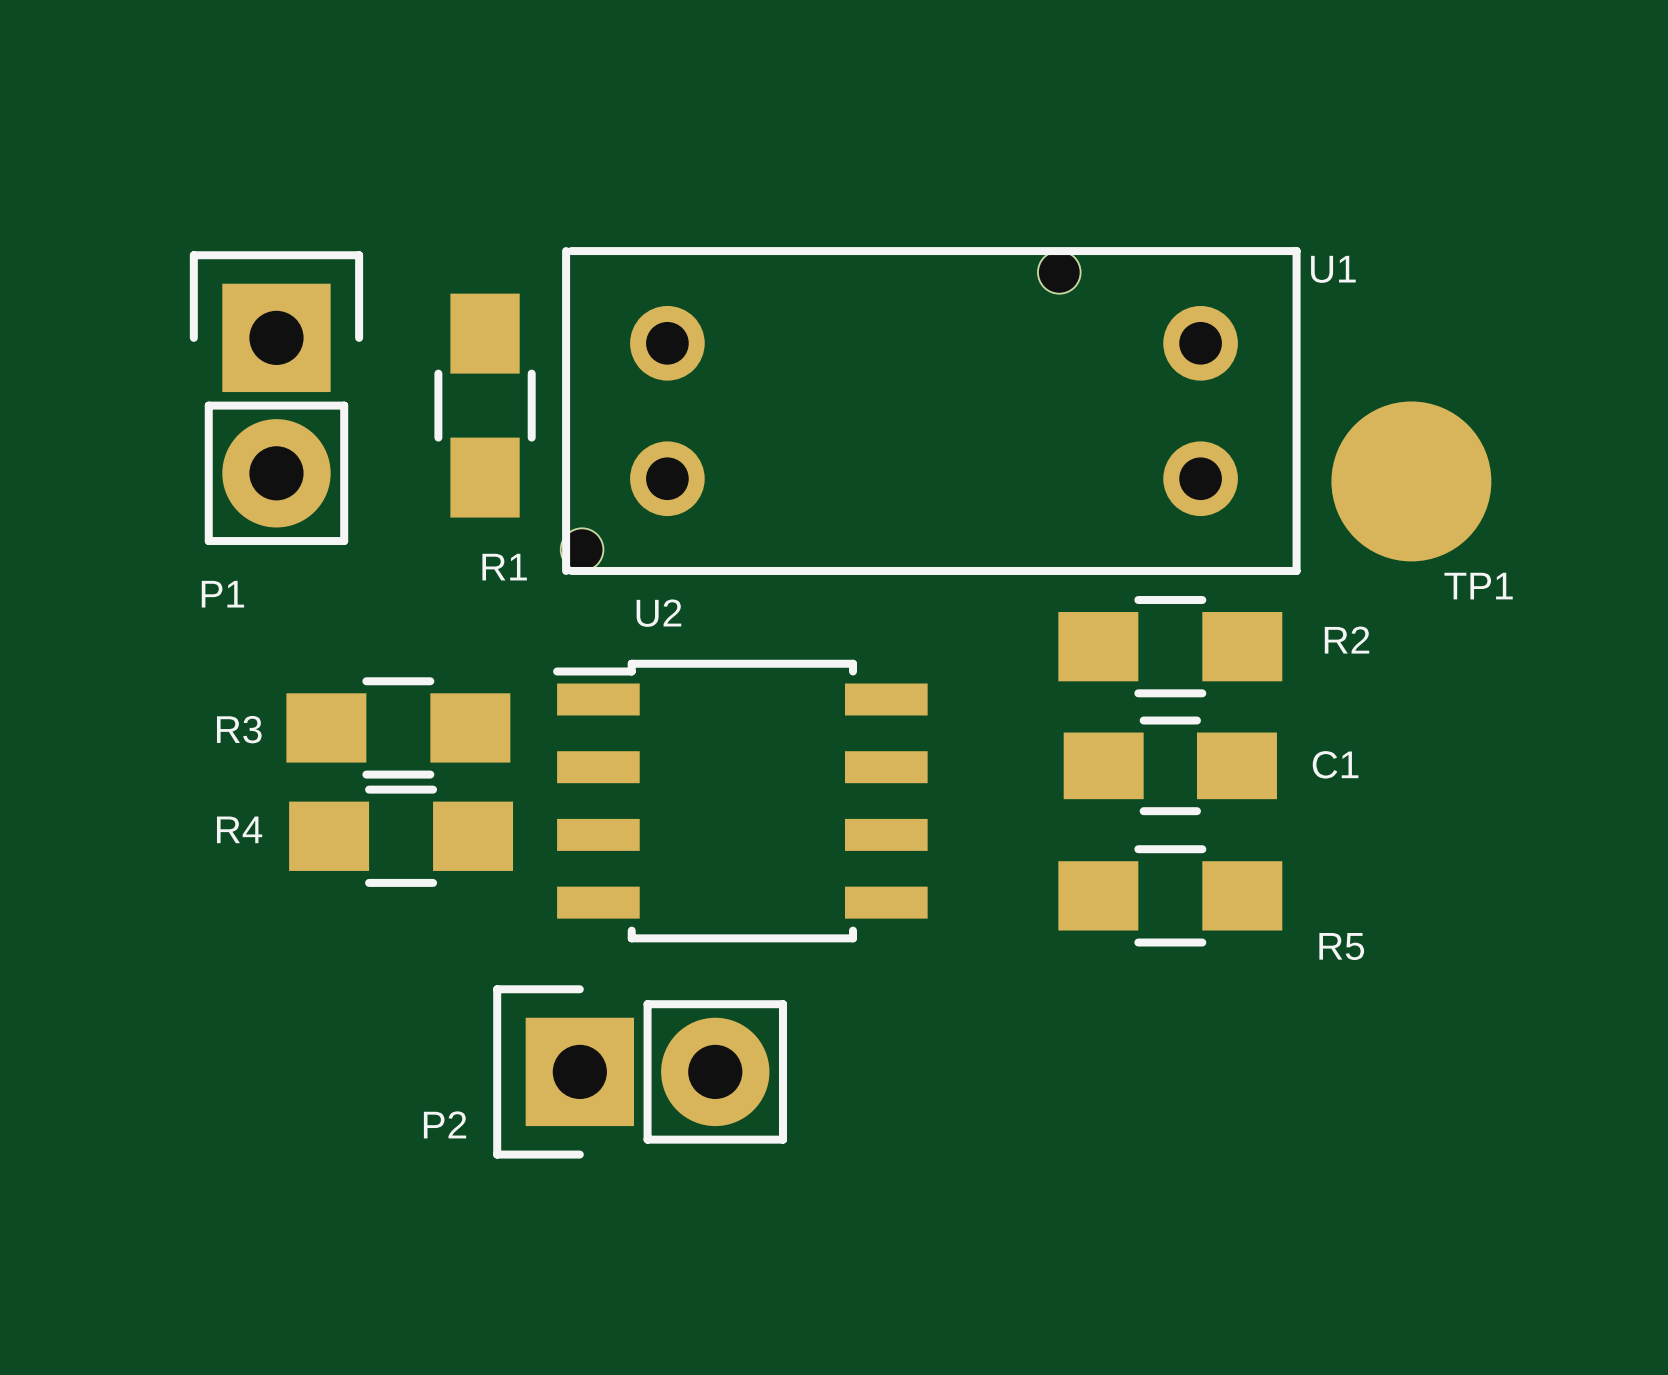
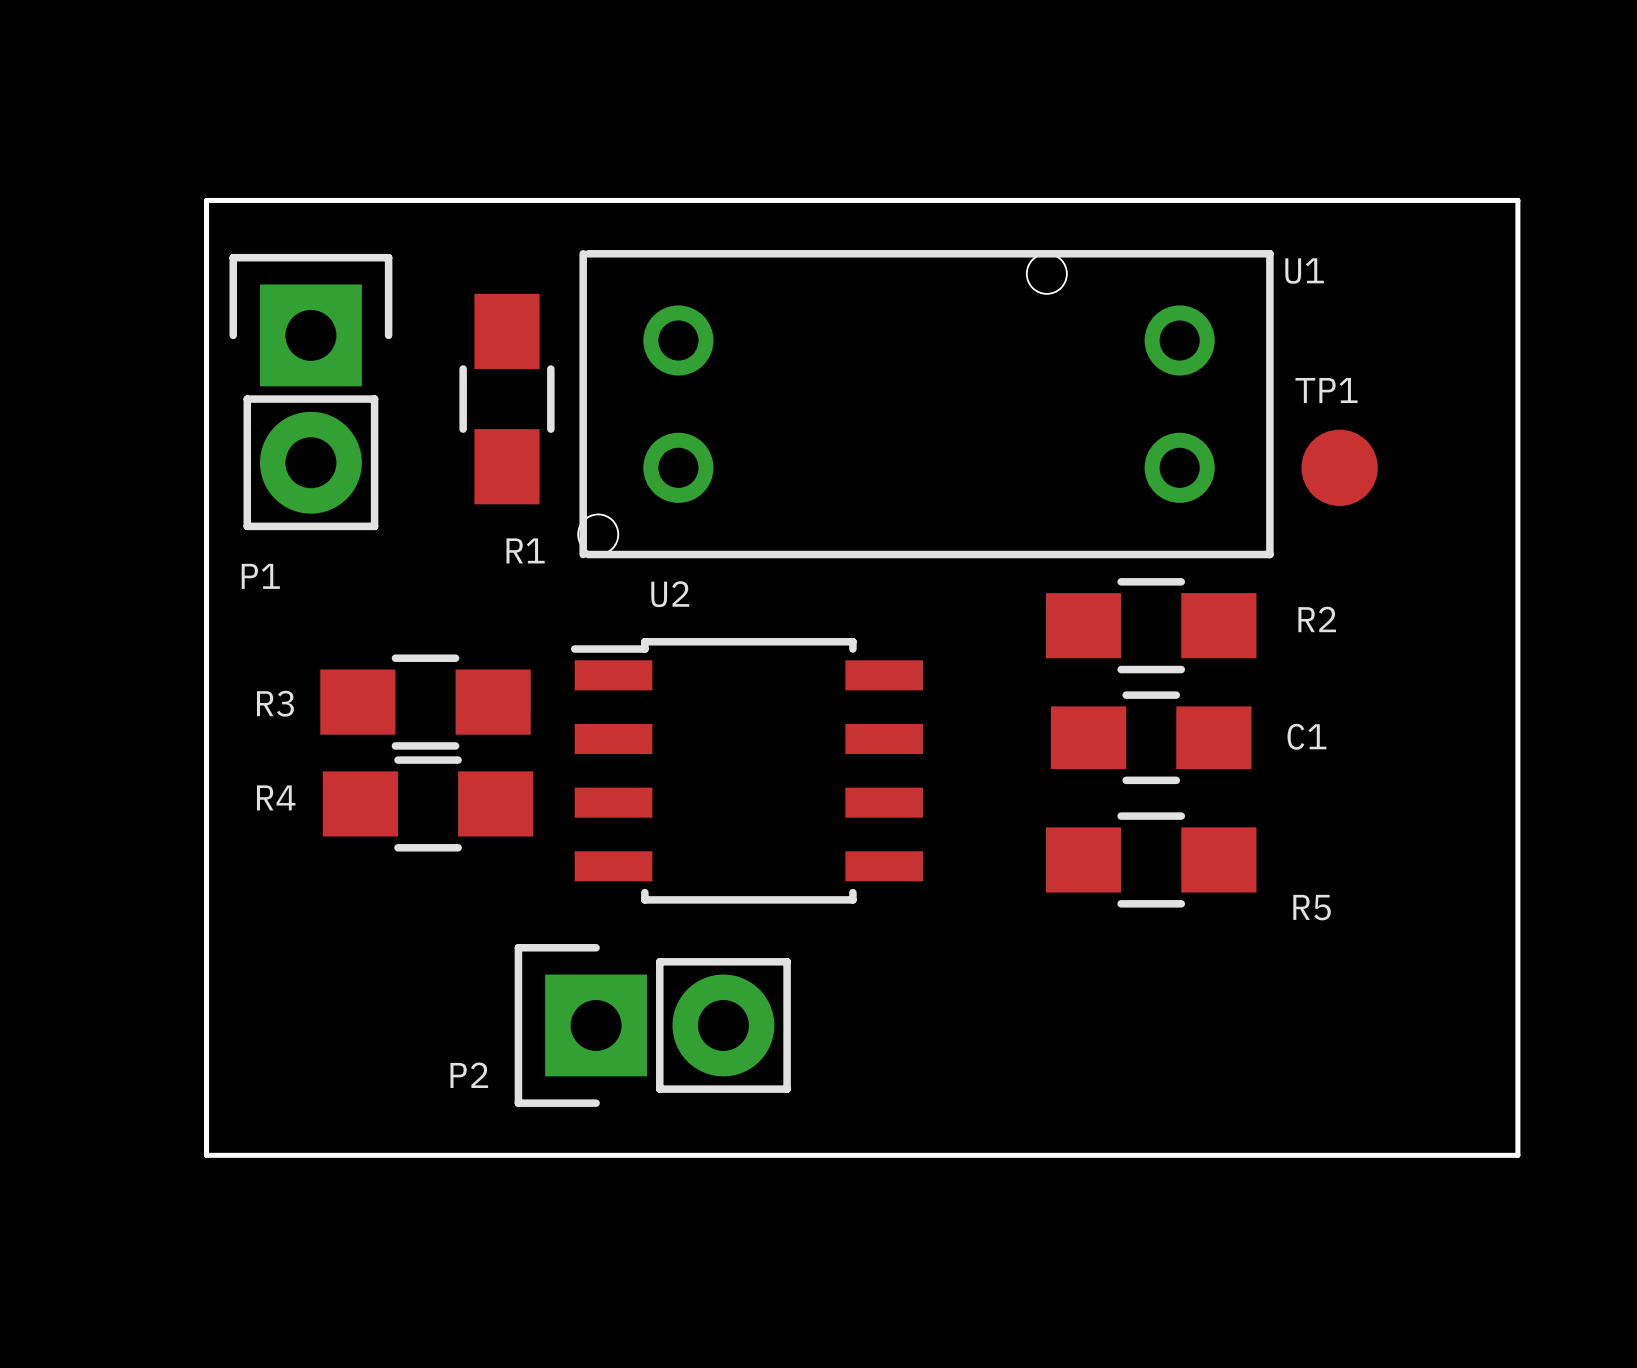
board edge: none -> (206, 200) (1517, 200) (1517, 1155) (206, 1155) (206, 200)
TP1 footprint: [1331, 401, 1492, 562] -> [1301, 429, 1378, 507]
TP1 name position: TP1 (1478, 586) -> TP1 (1326, 390)

